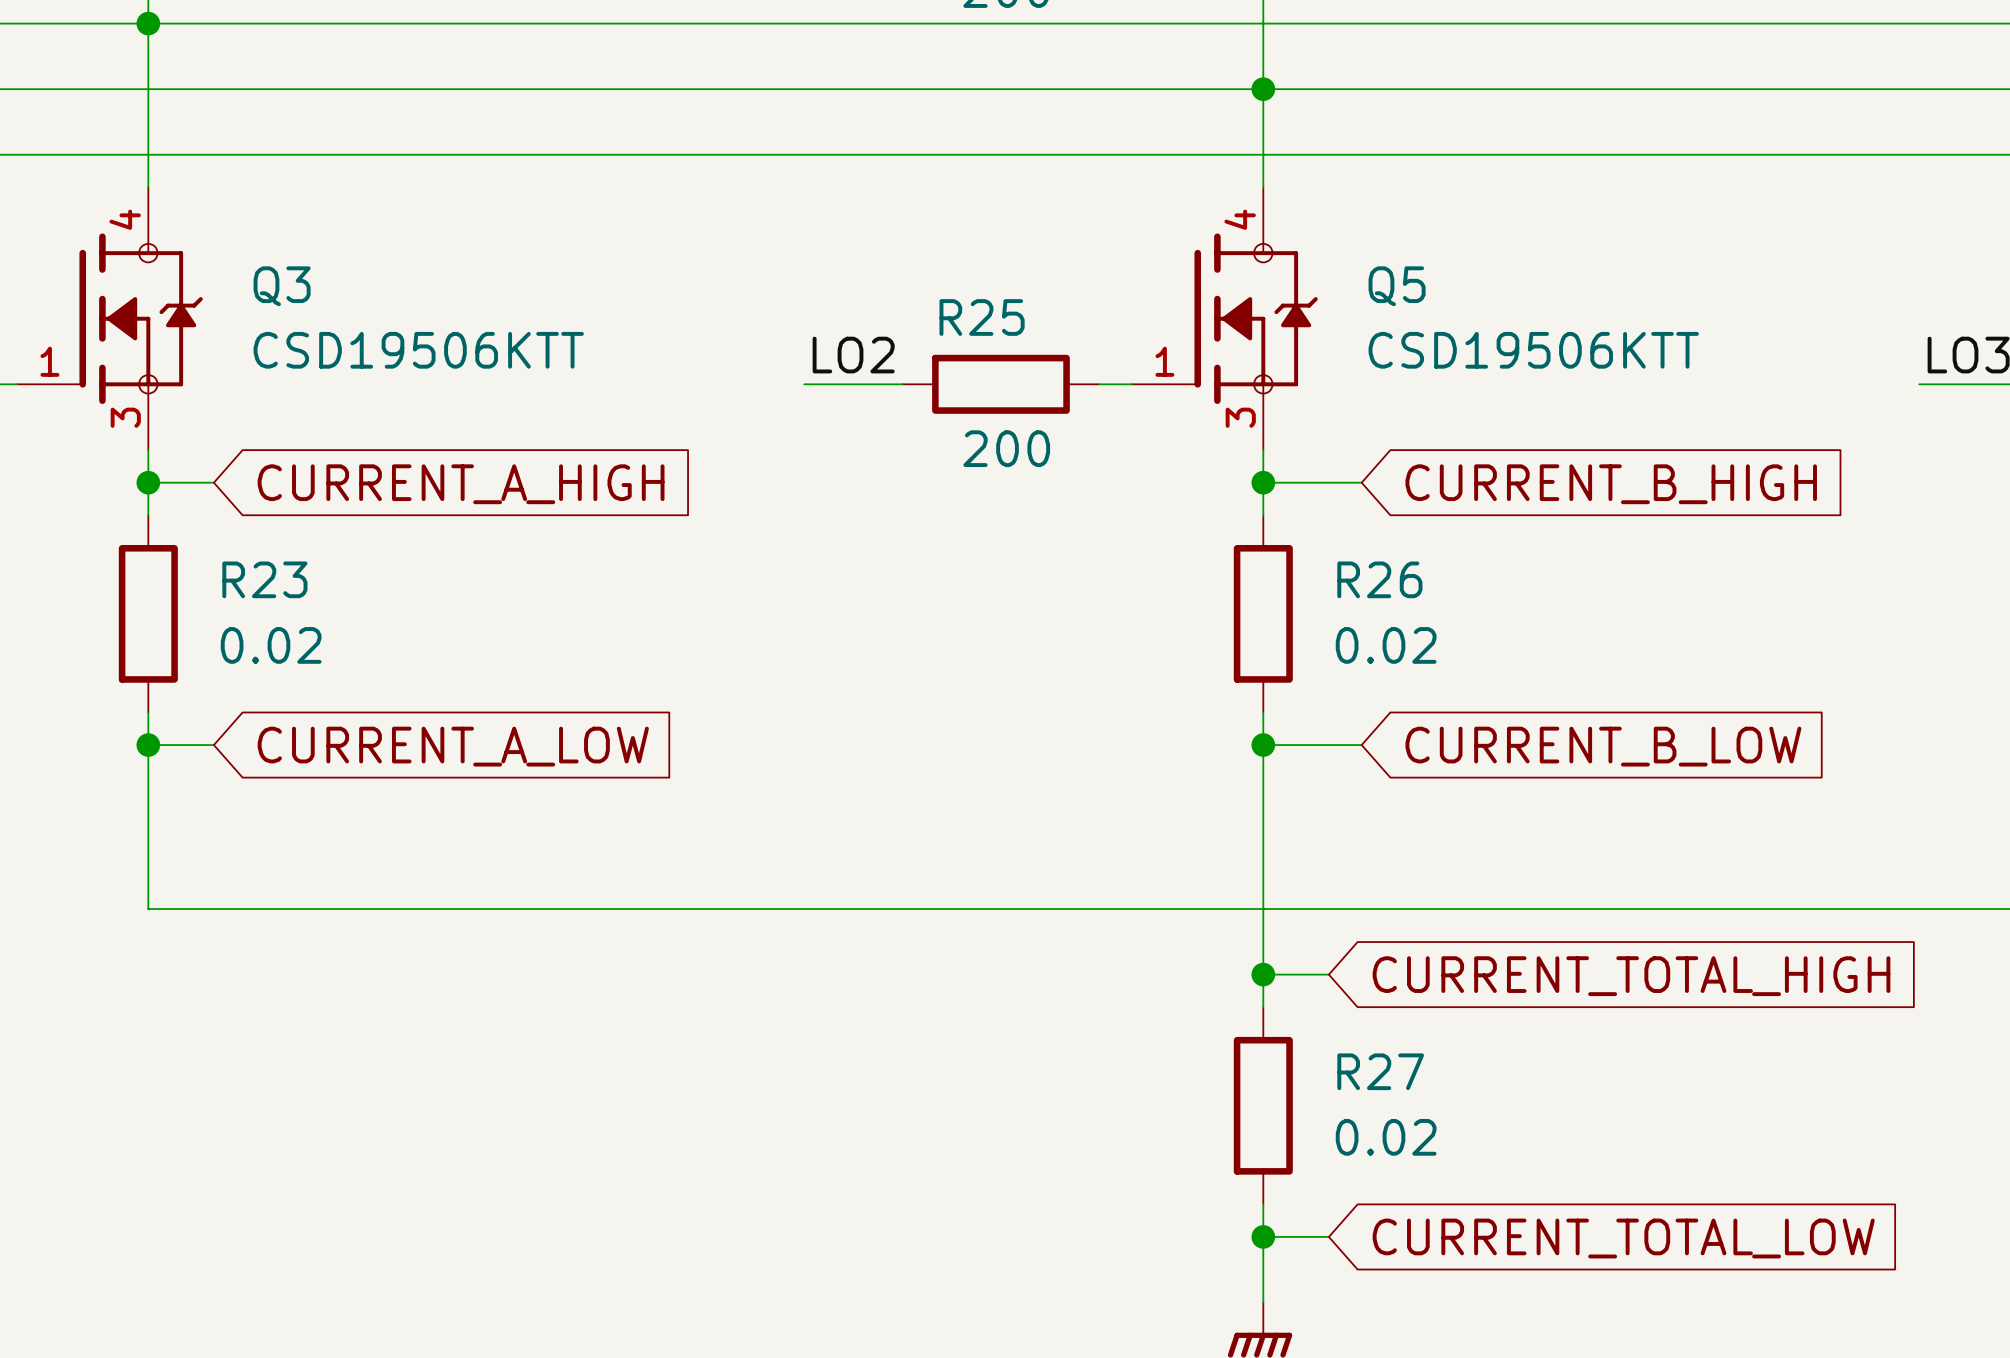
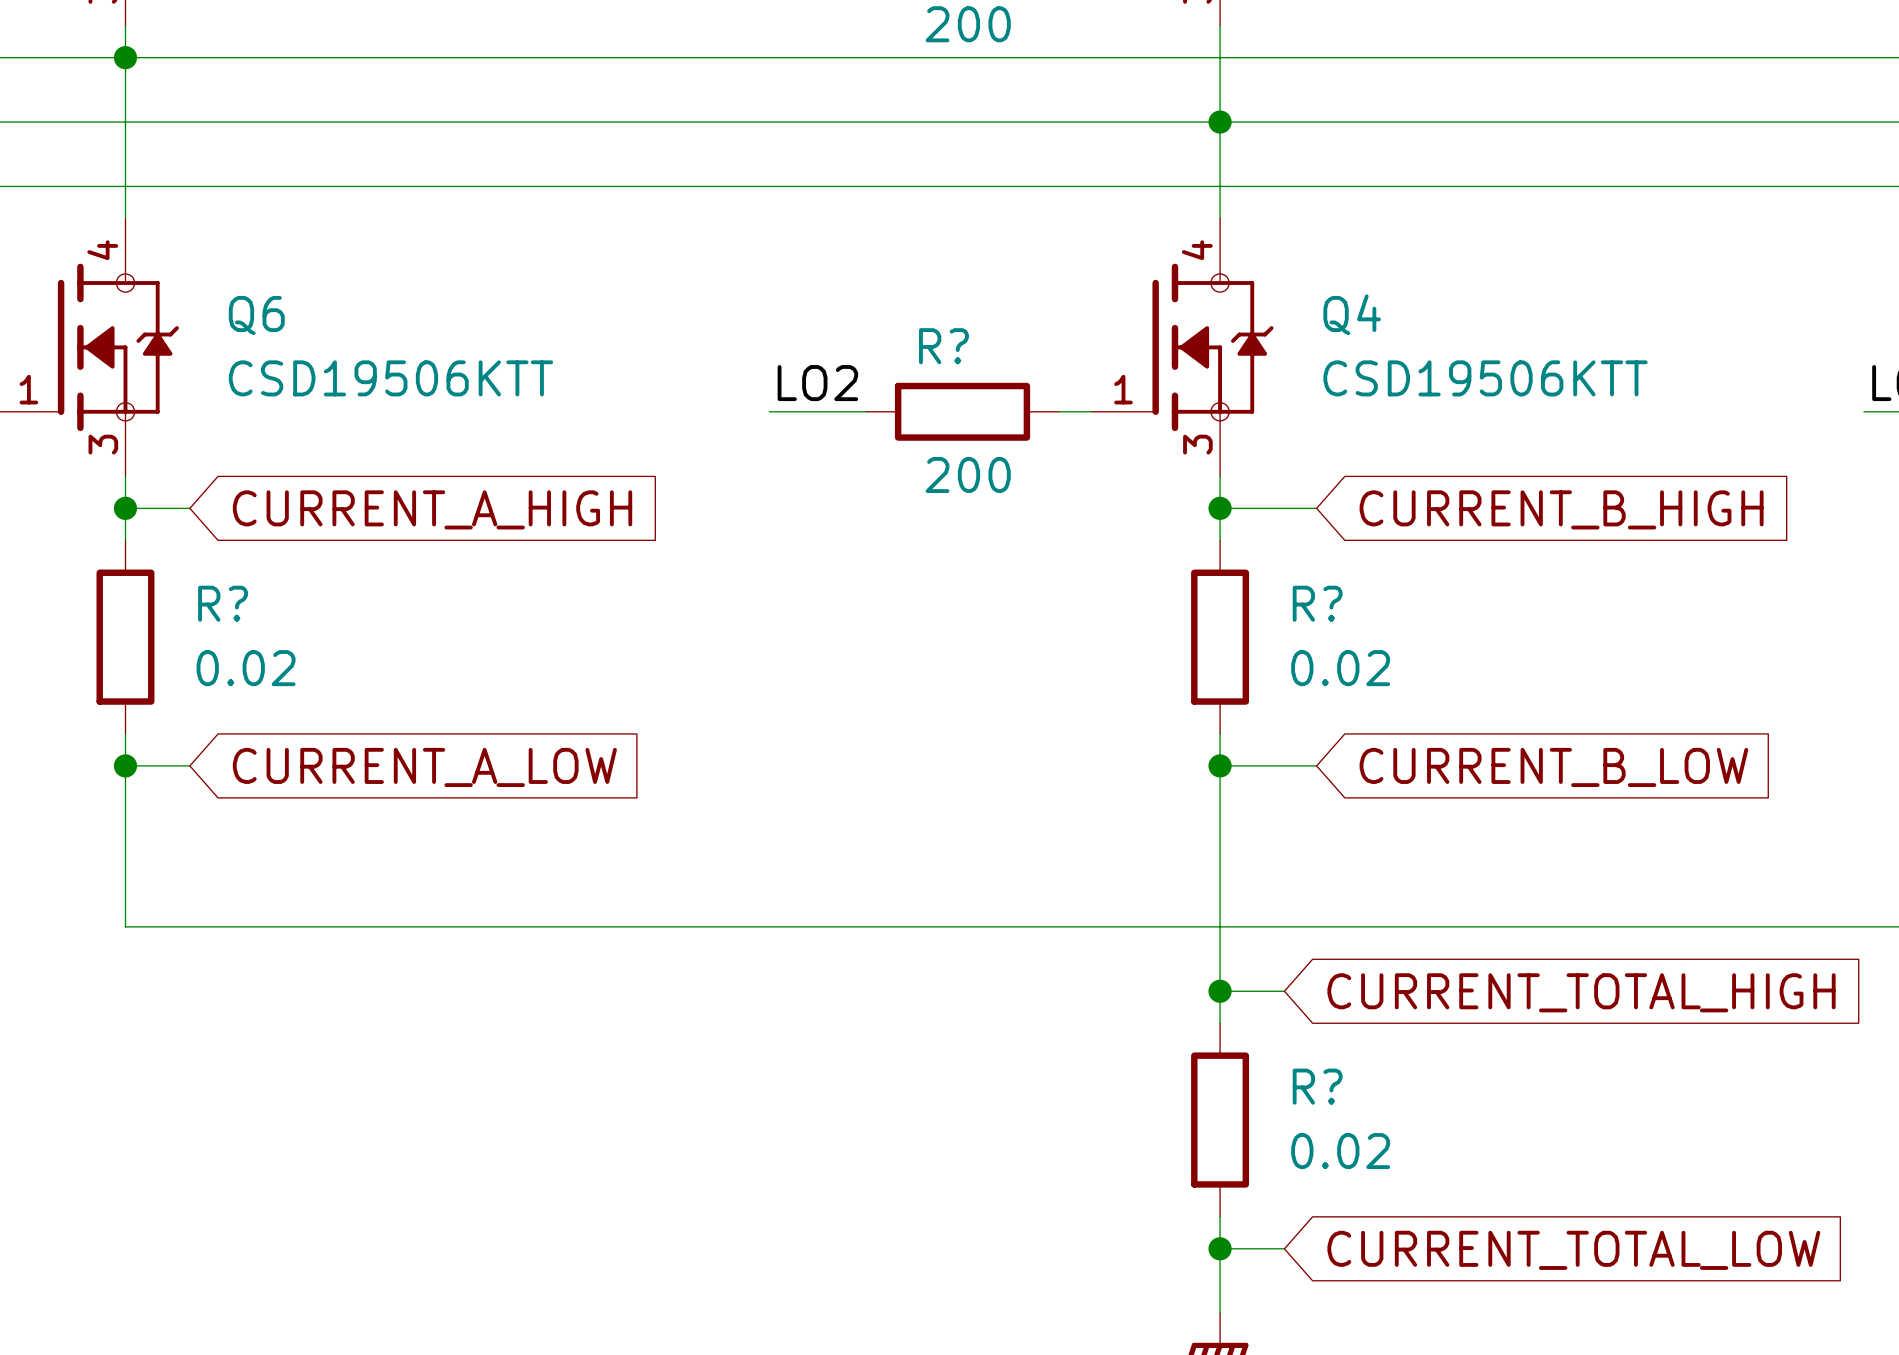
Q3 name: Q3 (282, 286) -> Q6 (256, 315)
Q5 name: Q5 (1397, 286) -> Q4 (1352, 314)
R25 name: R25 (982, 317) -> R? (943, 346)
R23 name: R23 (264, 579) -> R? (223, 603)
R26 name: R26 (1379, 579) -> R? (1317, 603)
R27 name: R27 (1380, 1071) -> R? (1317, 1086)

